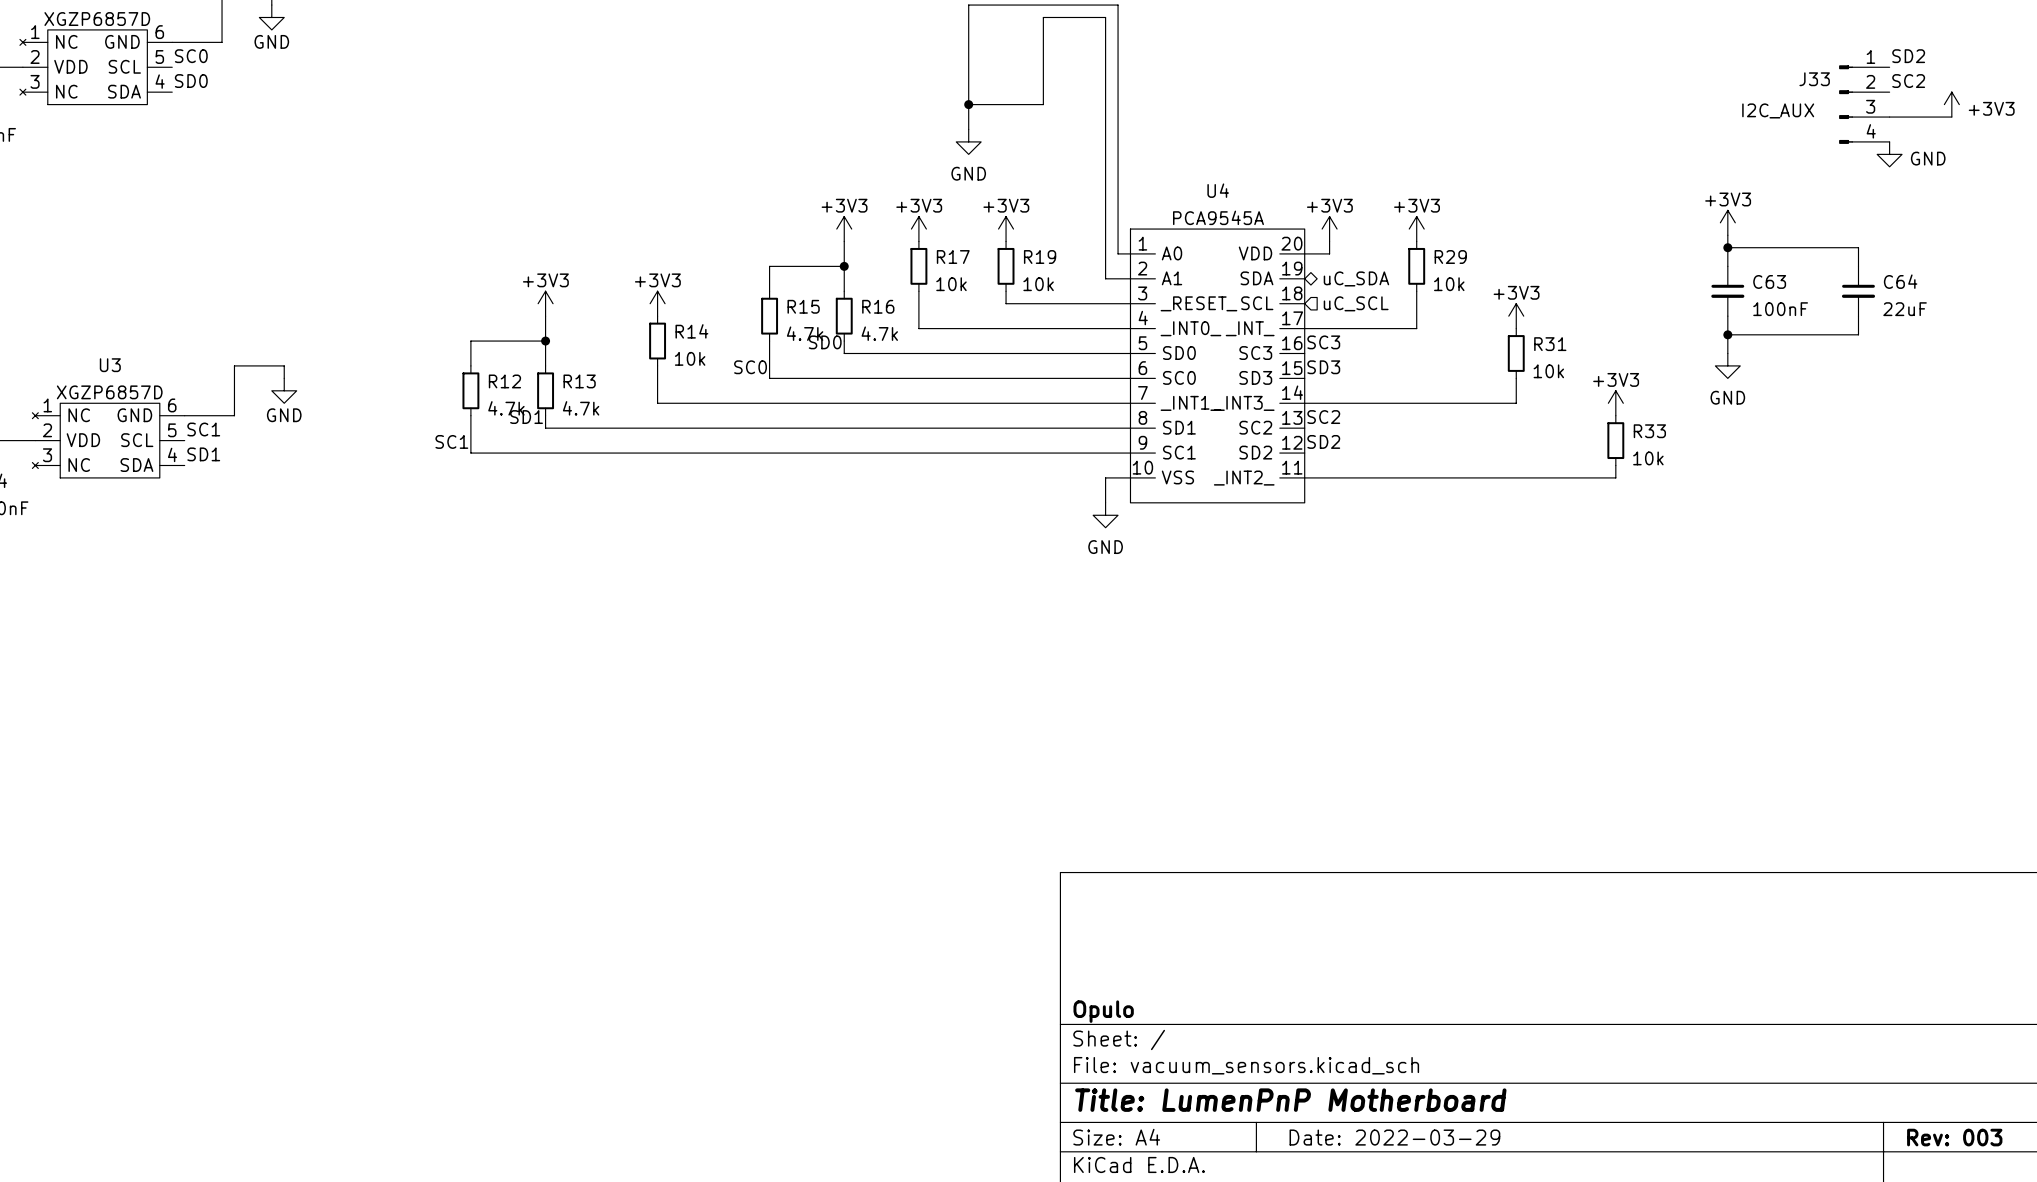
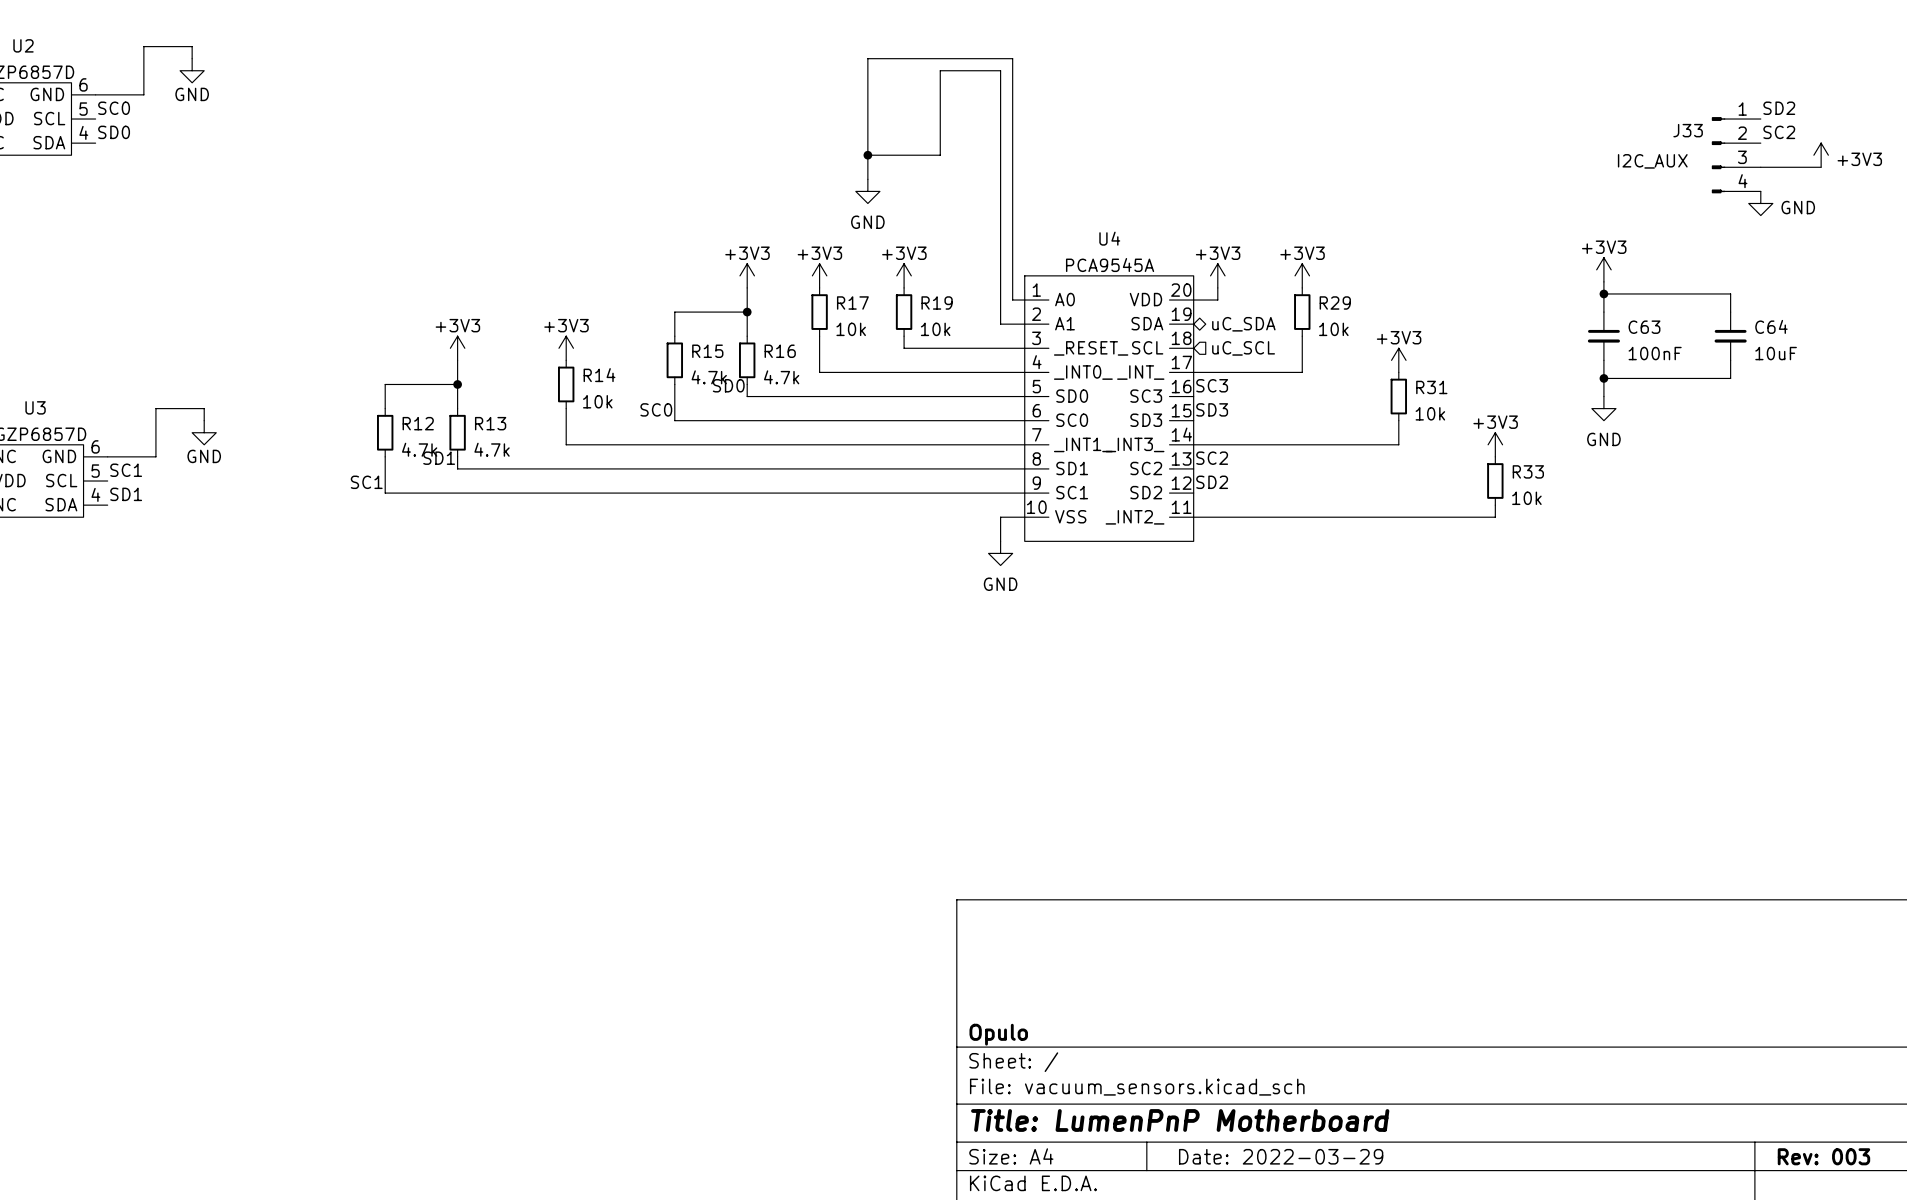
C64 value: 22uF (1905, 309) -> 10uF (1776, 353)

